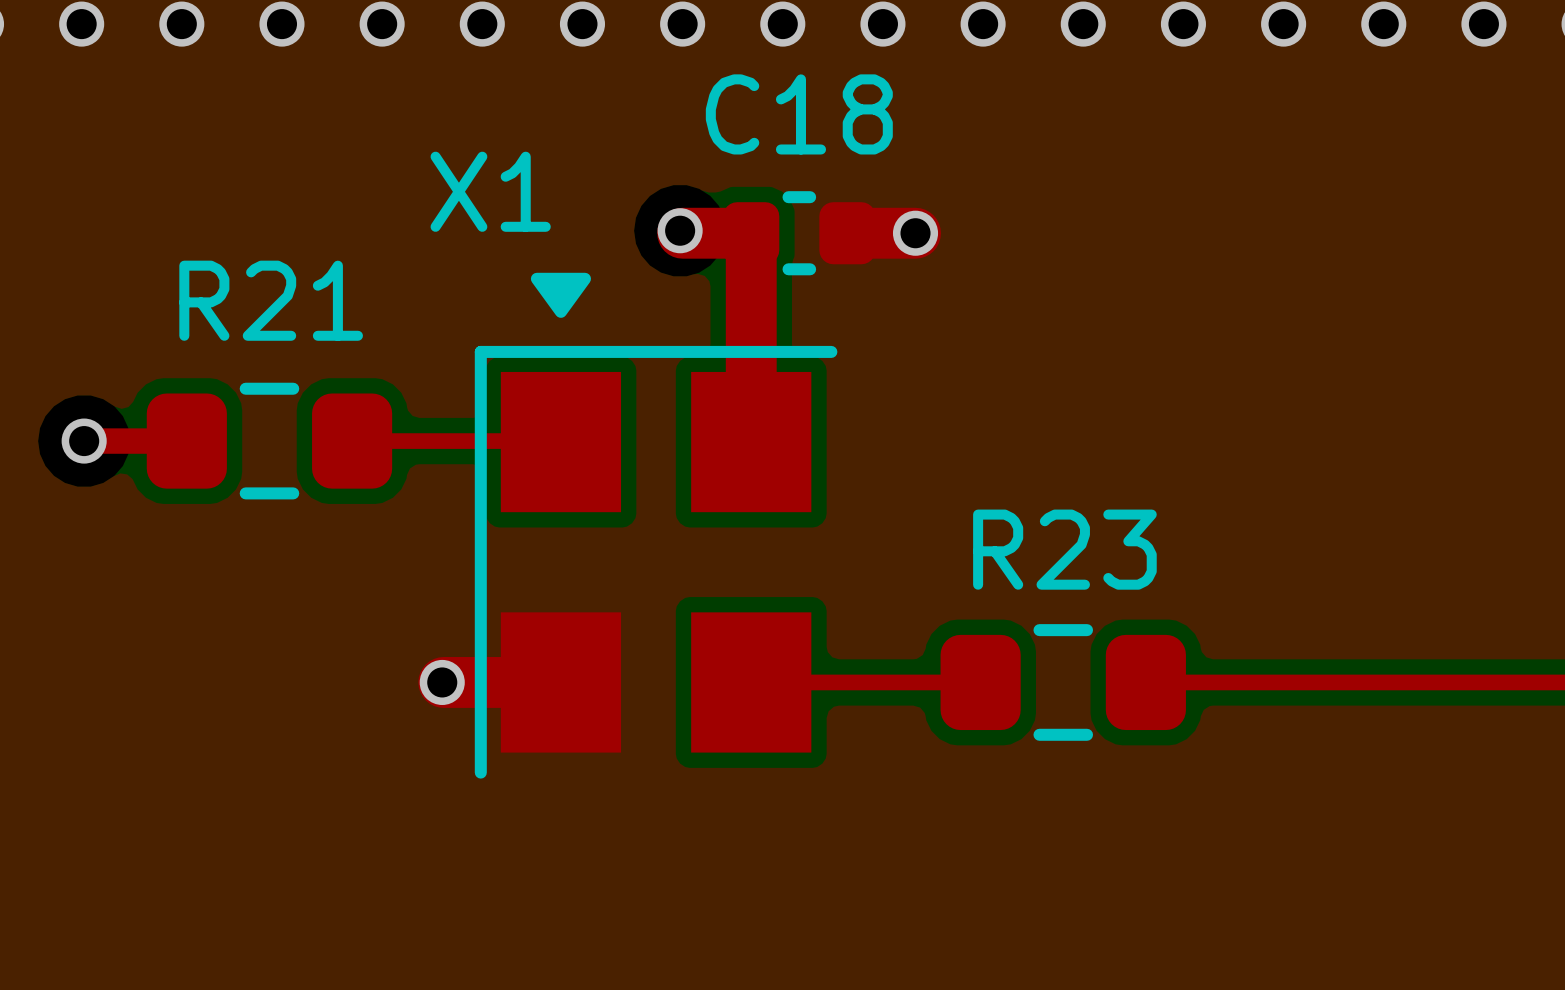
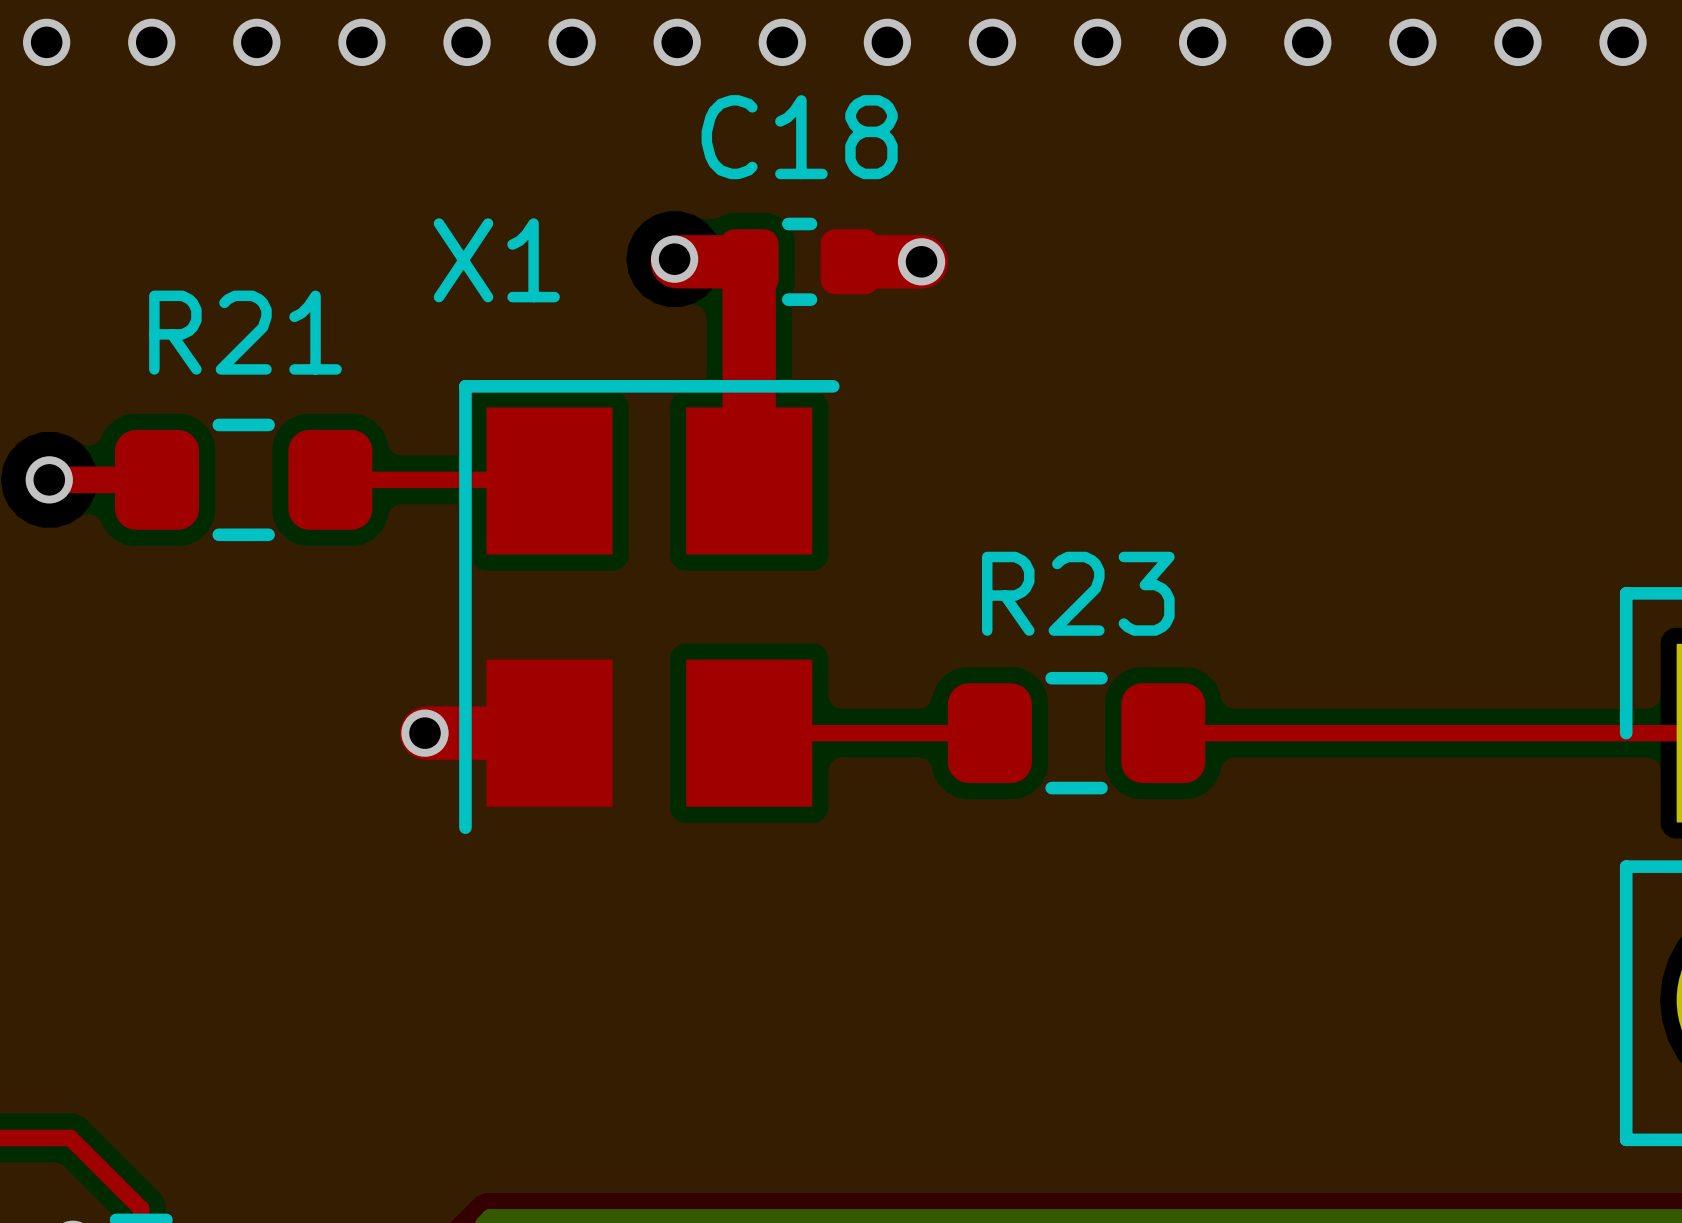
X1 name position: X1 (490, 191) -> X1 (496, 260)
X1 footprint: [474, 272, 838, 779] -> [459, 380, 840, 835]

